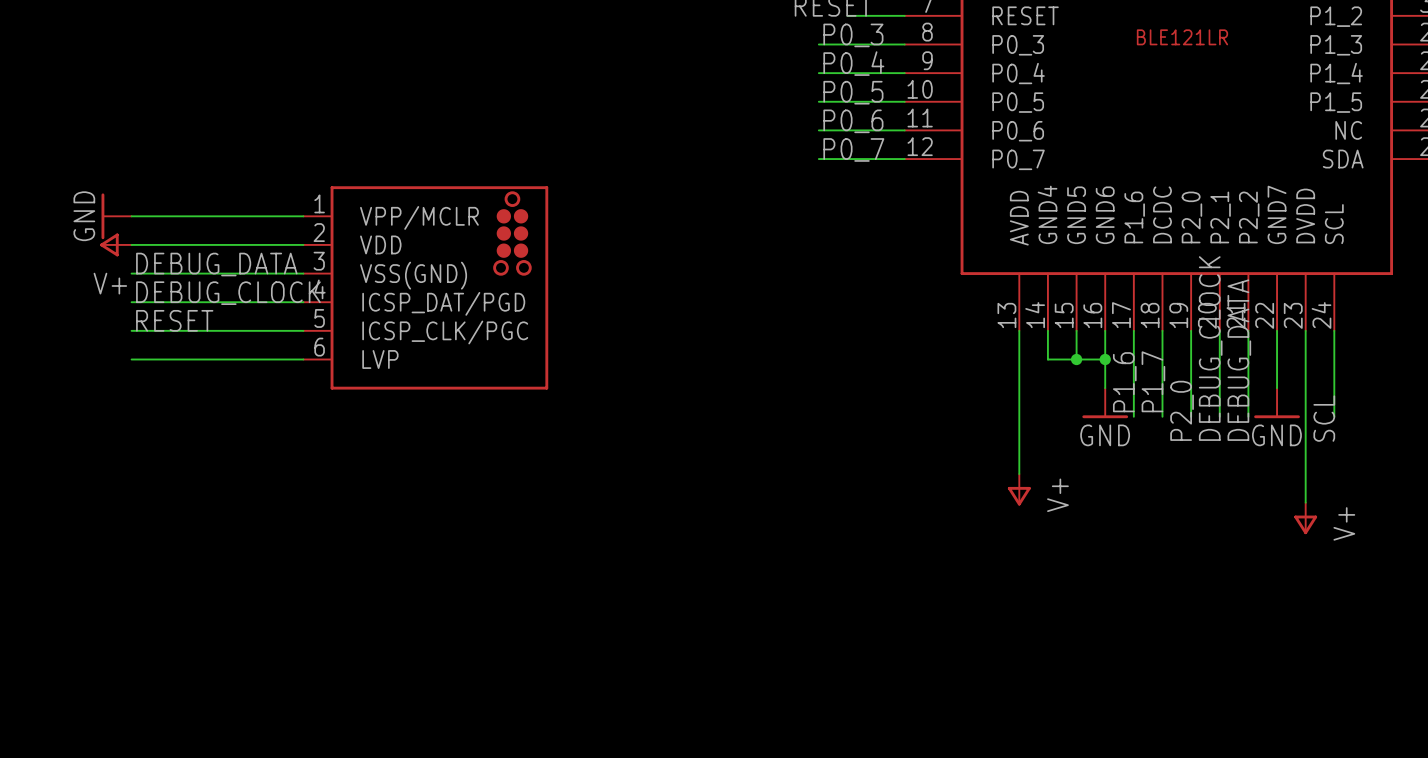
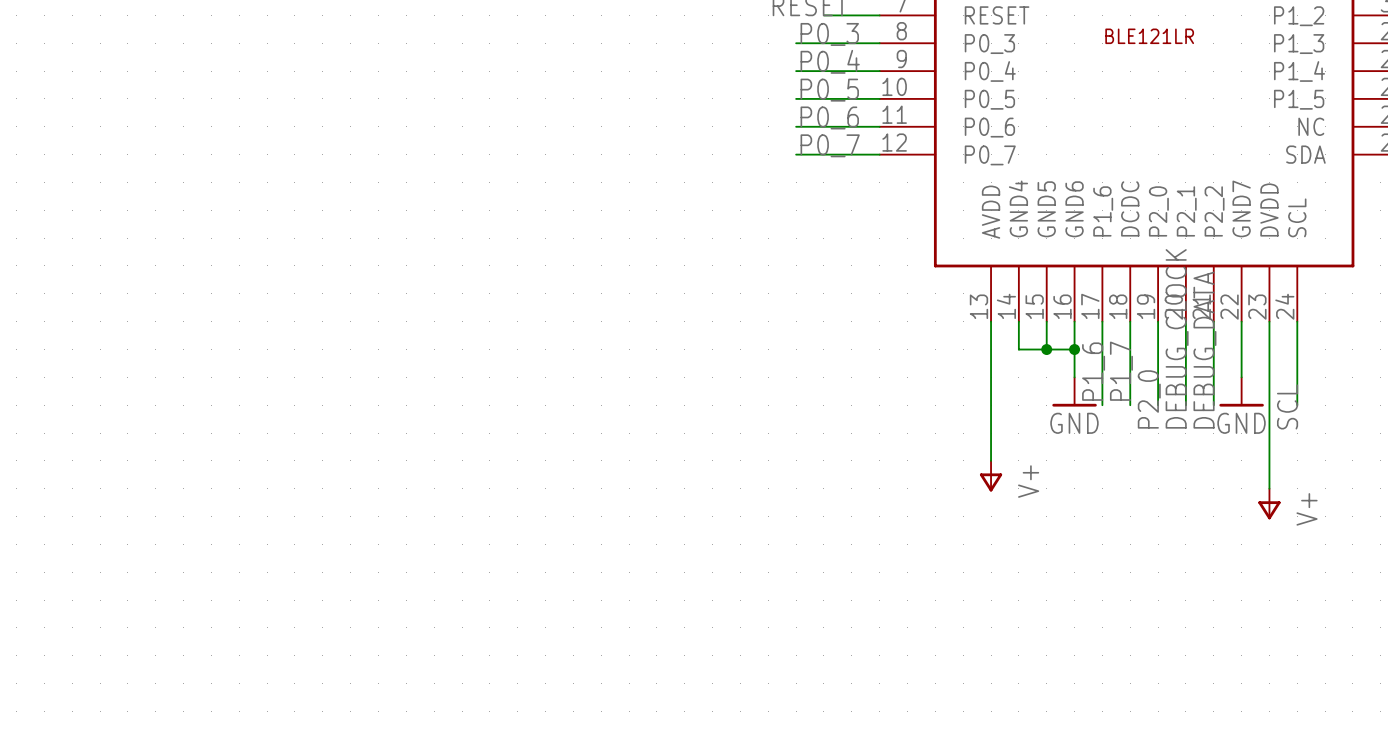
power symbol: GND (116, 216) -> none
wire: (131, 216) (303, 216) -> none
power symbol: V+ (115, 244) -> none
wire: (131, 244) (303, 244) -> none
label: DEBUG_DATA (216, 264) -> none
wire: (131, 273) (303, 273) -> none
part: (425, 287) -> none
label: DEBUG_CLOCK (228, 293) -> none
wire: (131, 302) (303, 302) -> none
label: RESET (174, 320) -> none
wire: (131, 330) (303, 330) -> none
wire: (131, 359) (303, 359) -> none

